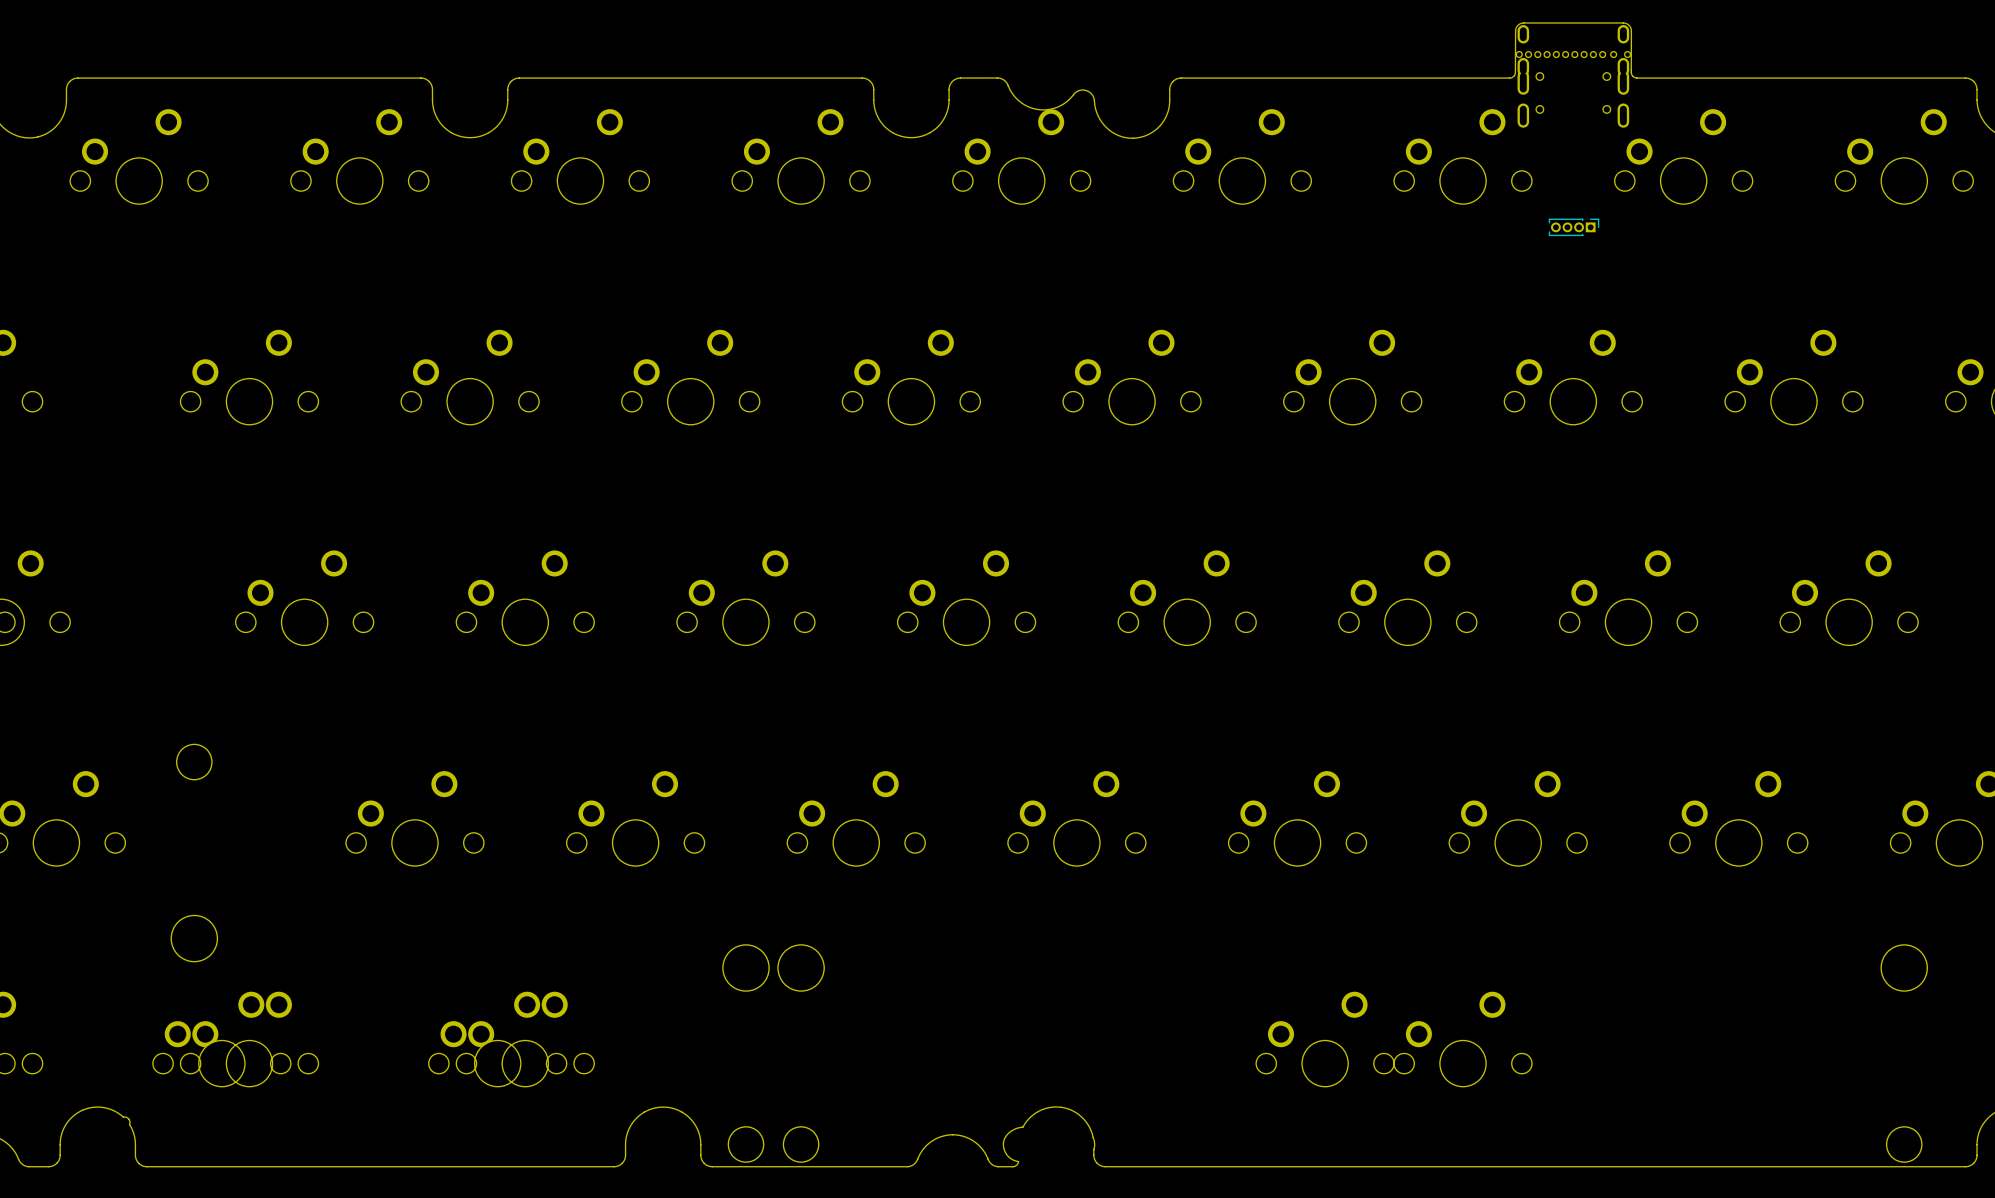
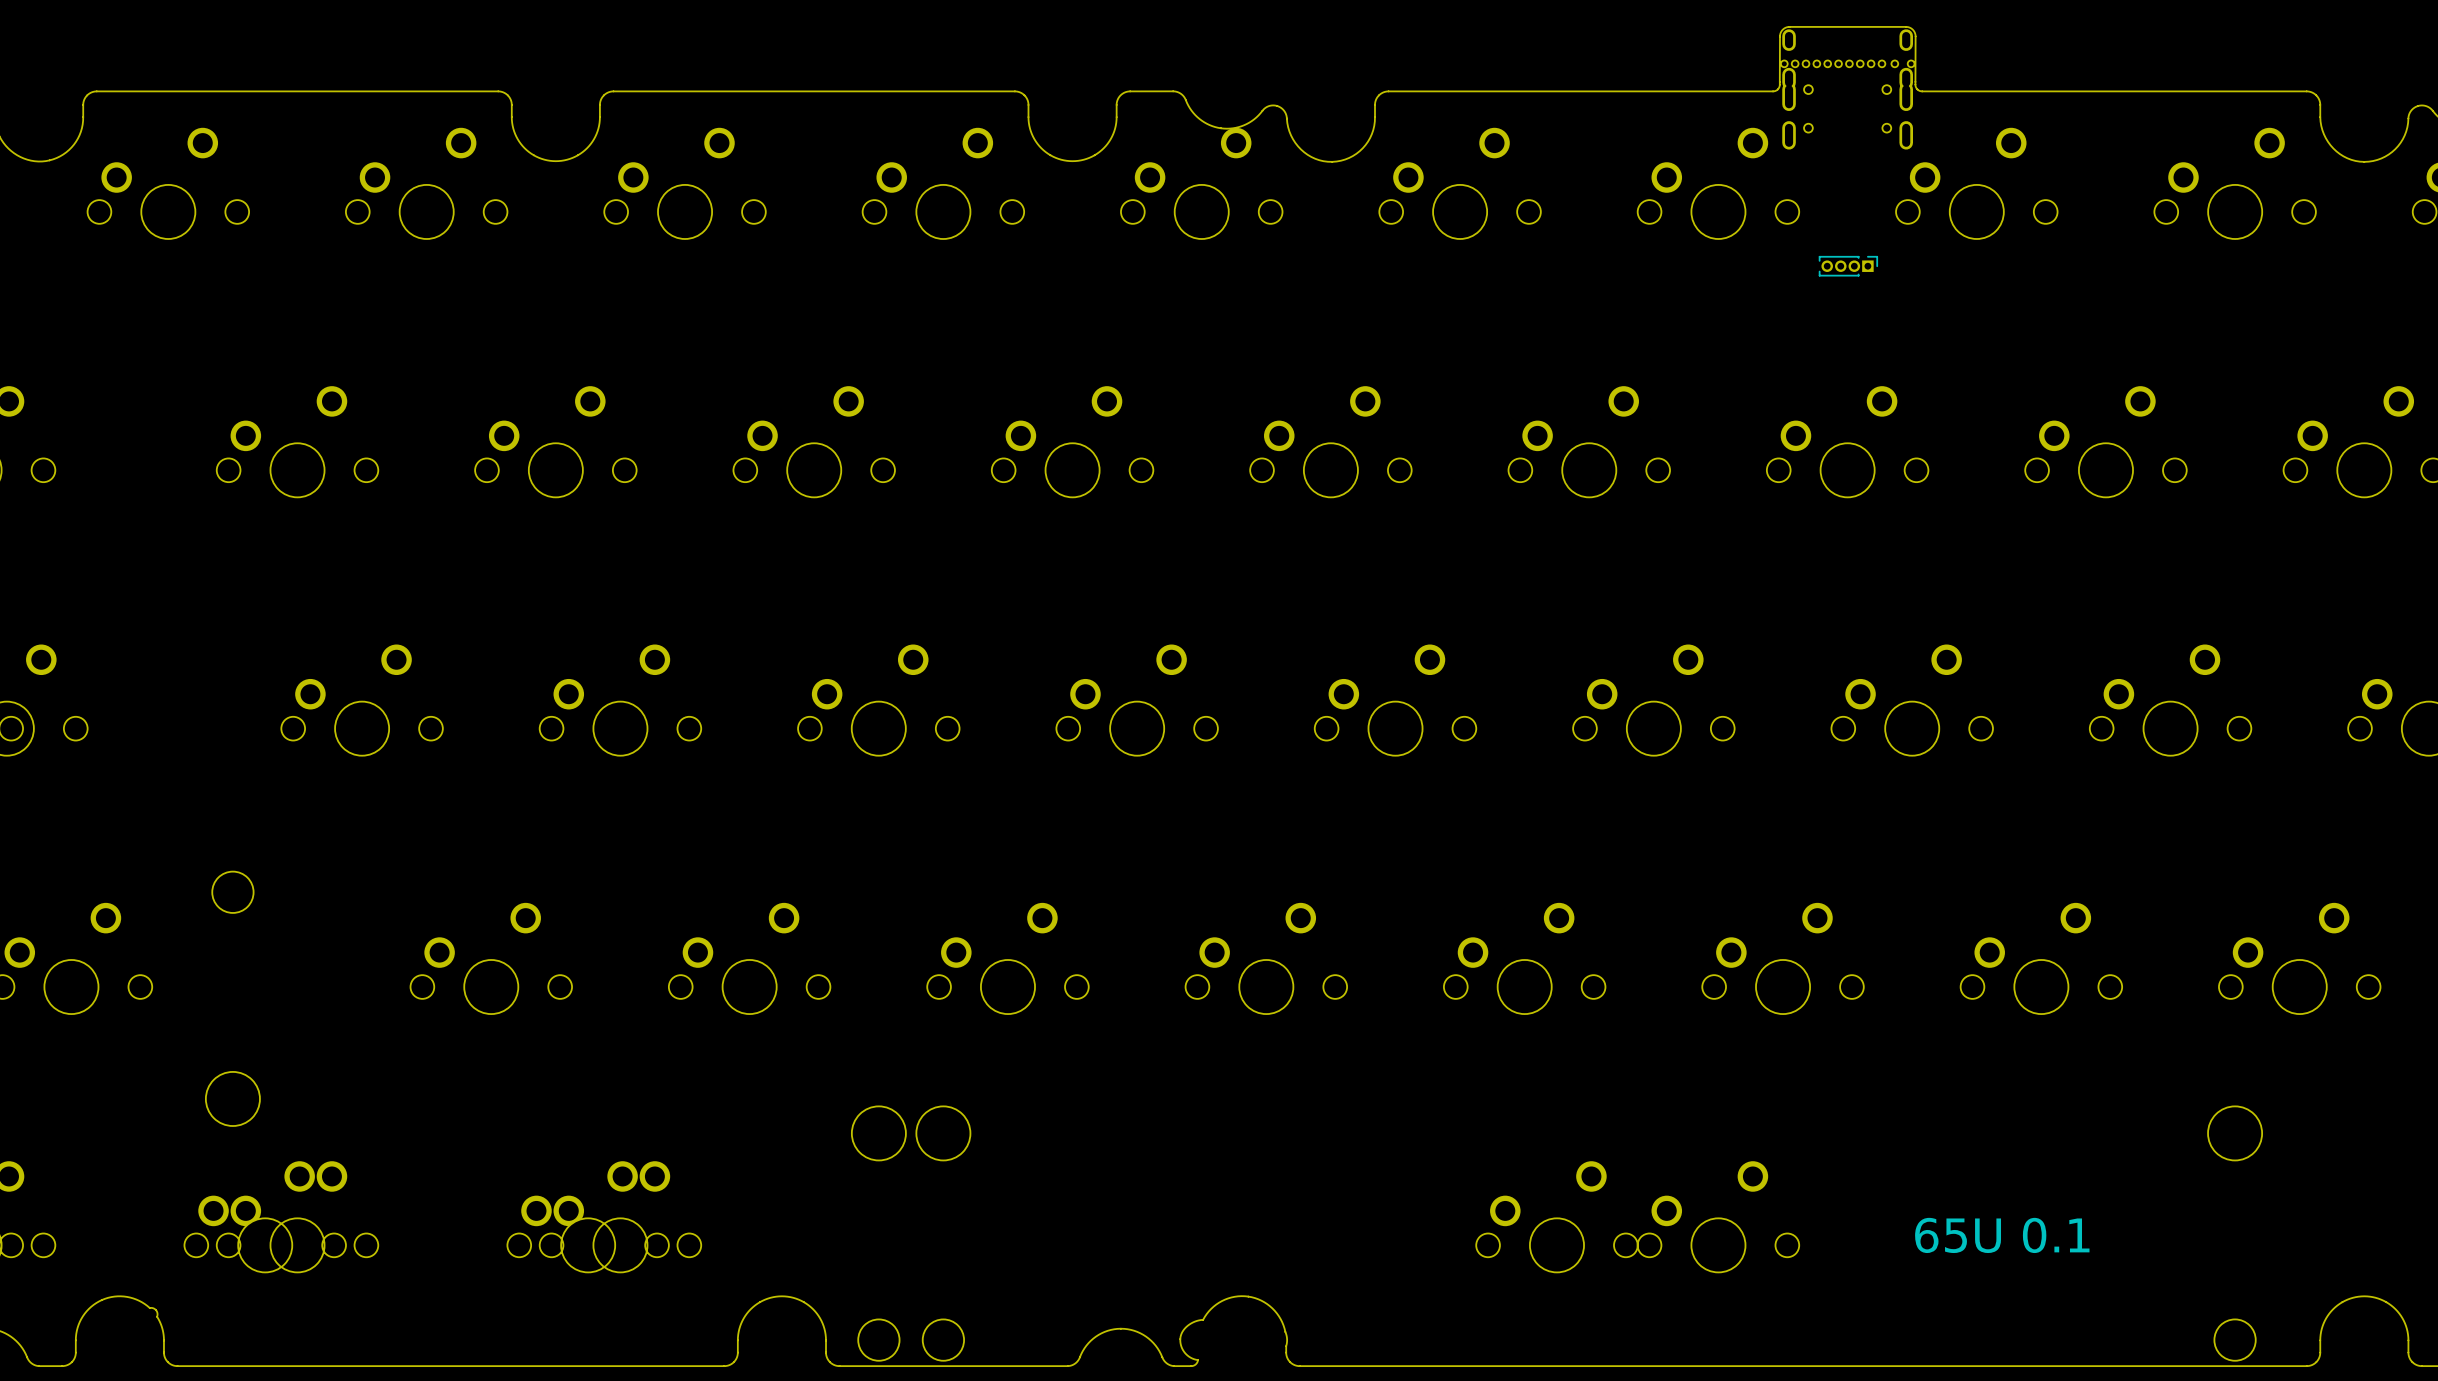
text: none -> 65U 0.1 (2002, 1235)

